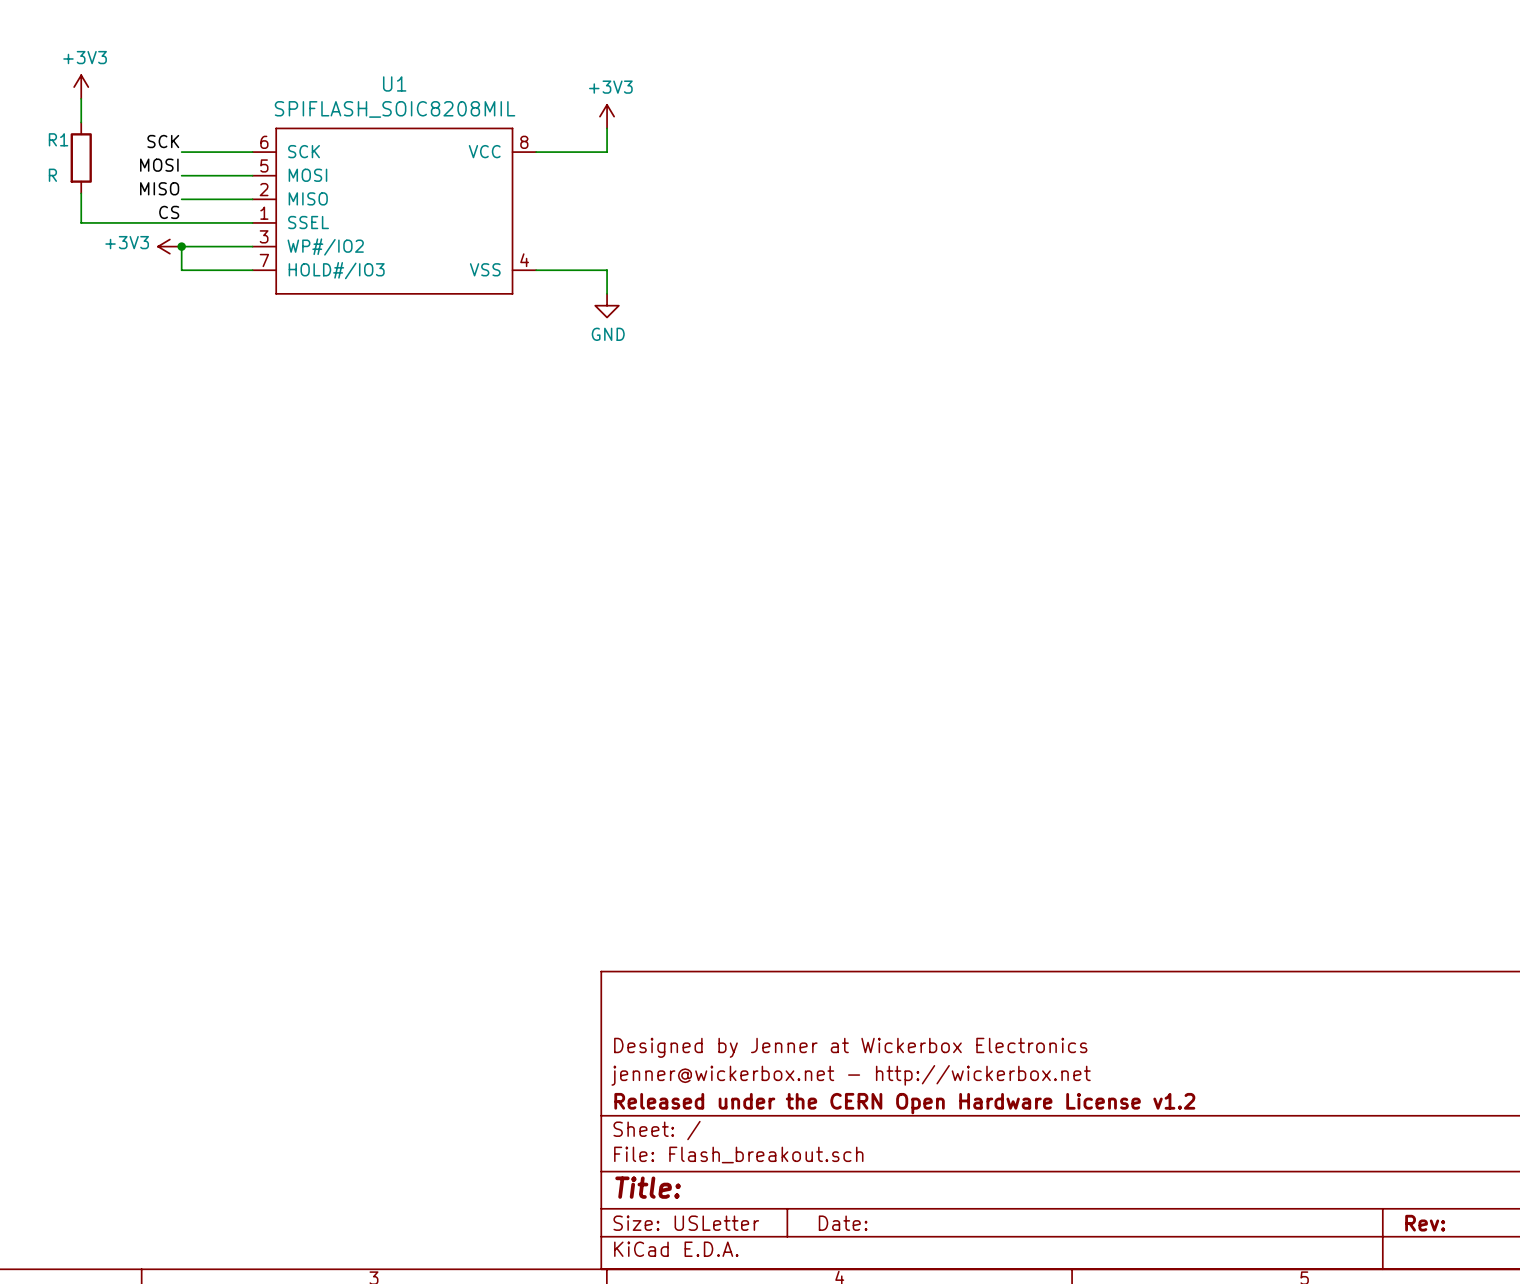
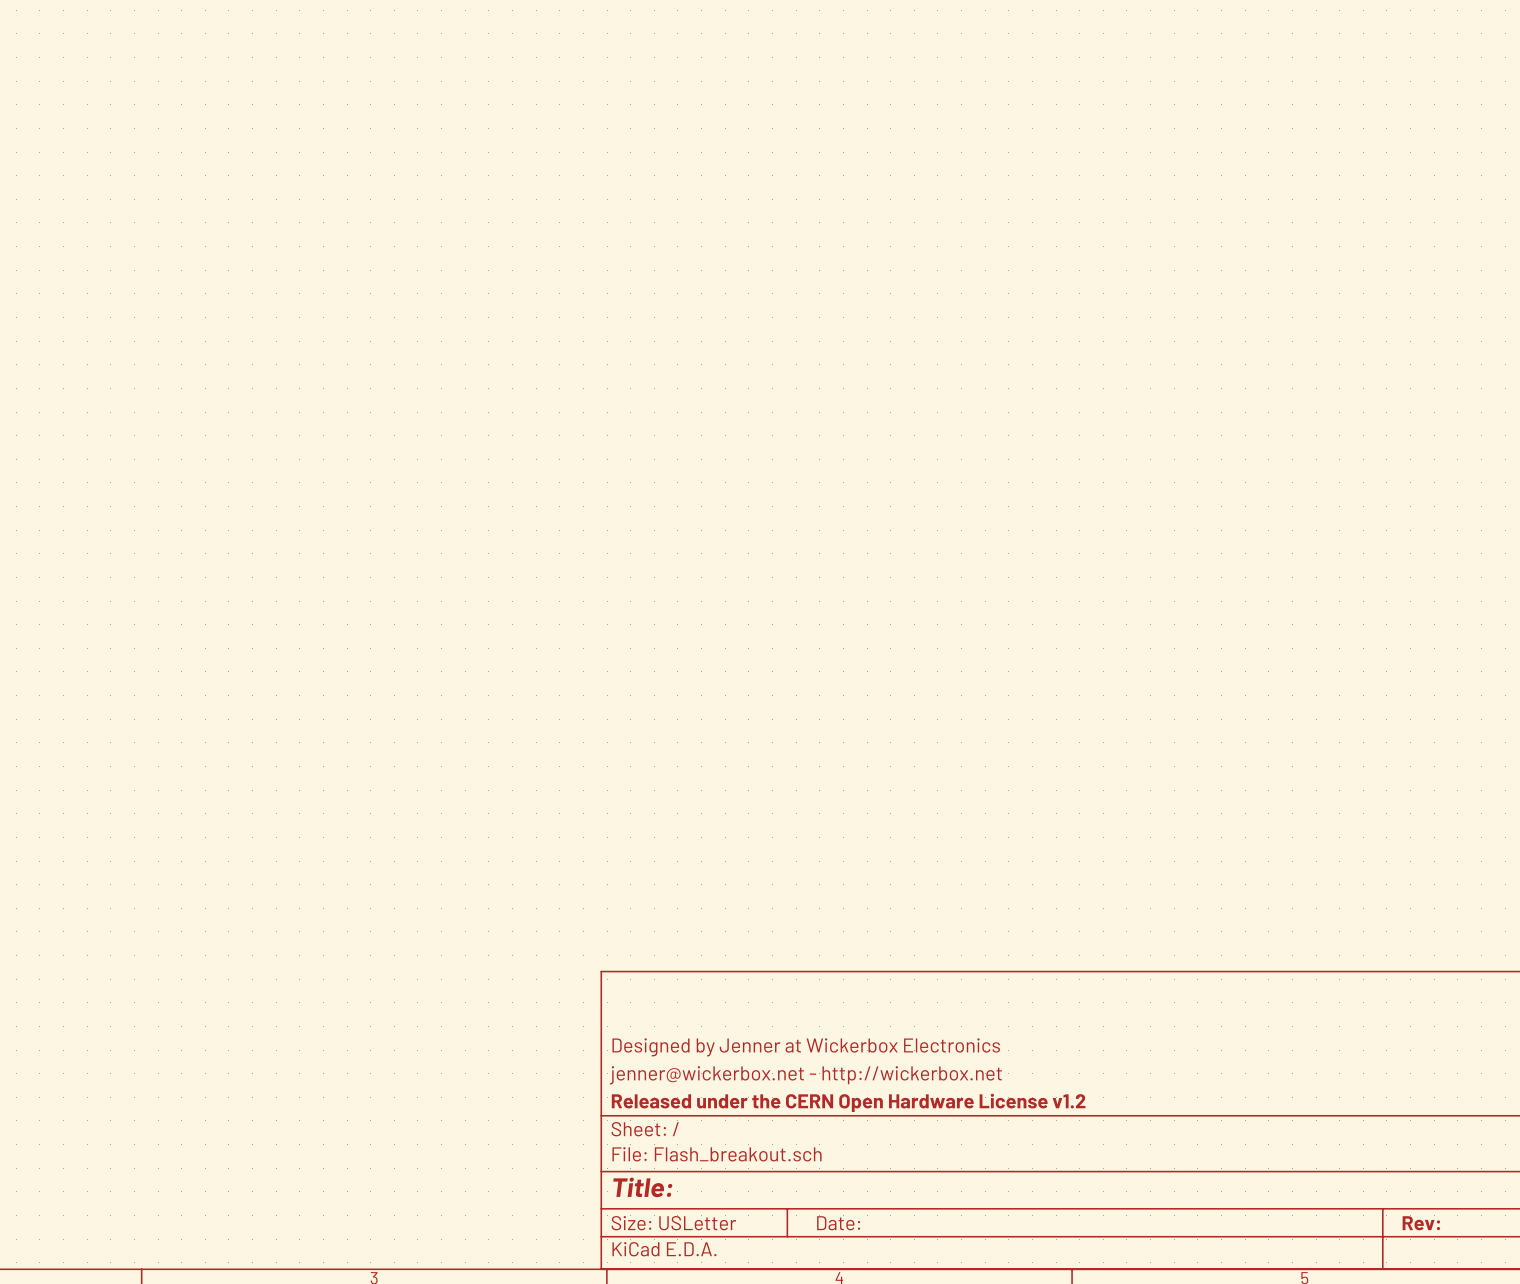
power symbol: +3V3 (81, 87) -> none
wire: (81, 98) (81, 122) -> none
power symbol: +3V3 (607, 116) -> none
wire: (607, 128) (607, 152) (536, 152) -> none
label: SCK (163, 141) -> none
wire: (181, 152) (252, 152) -> none
R1: R (81, 157) -> none
label: MOSI (159, 165) -> none
wire: (181, 175) (252, 175) -> none
label: MISO (159, 188) -> none
wire: (81, 193) (81, 222) (252, 222) -> none
wire: (181, 199) (252, 199) -> none
U1: SPIFLASH_SOIC8208MIL (394, 211) -> none
label: CS (169, 212) -> none
power symbol: +3V3 (169, 246) -> none
junction: (181, 246) -> none
wire: (252, 246) (181, 246) (181, 270) (252, 270) -> none
wire: (536, 270) (607, 270) (607, 293) -> none
power symbol: GND (607, 305) -> none

